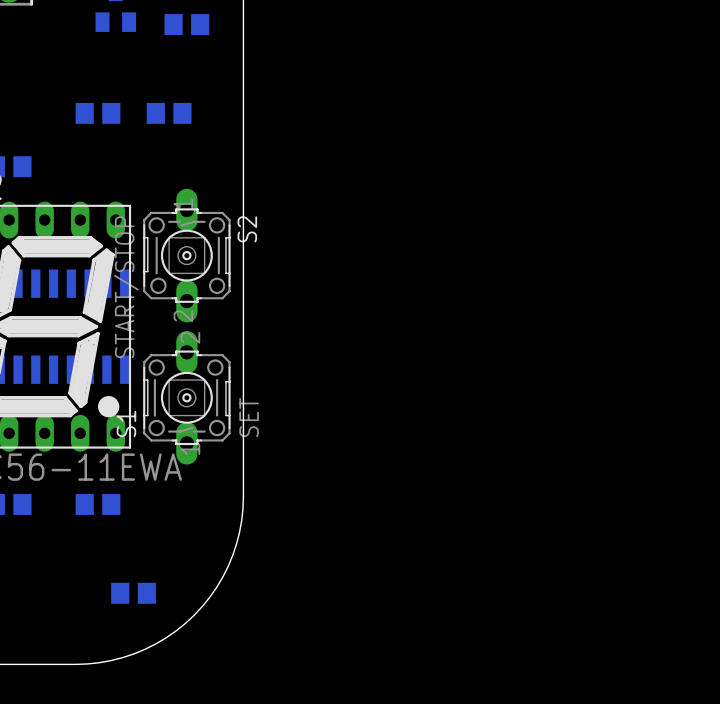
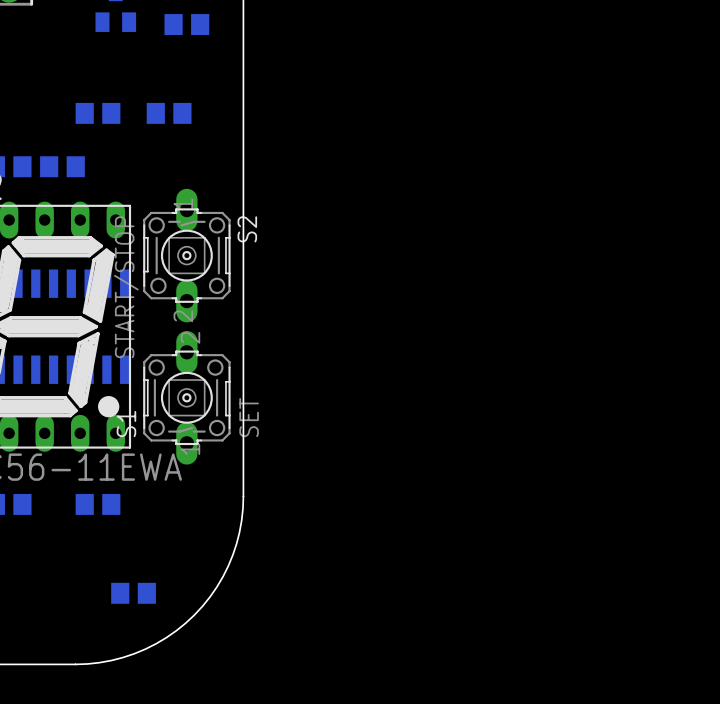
part: none -> (62, 166)

